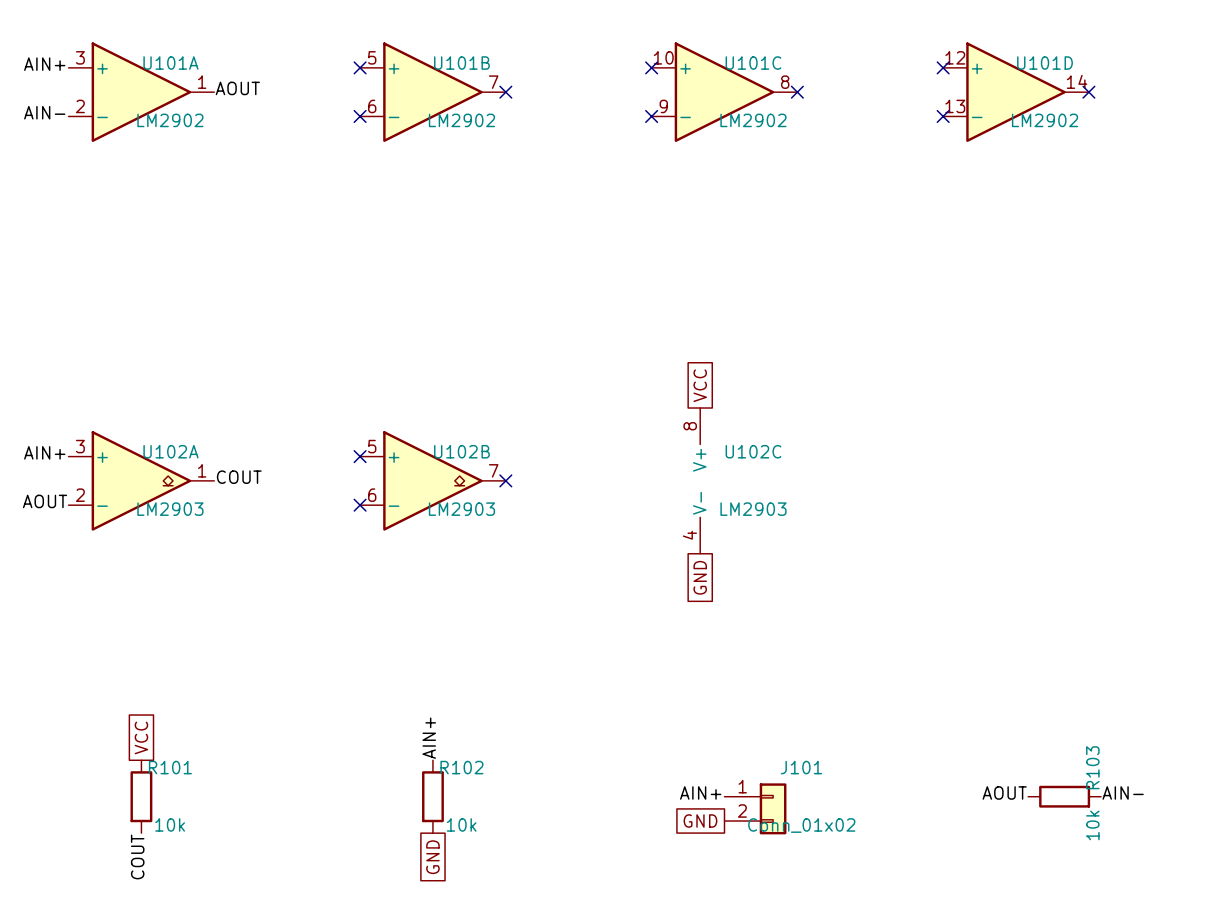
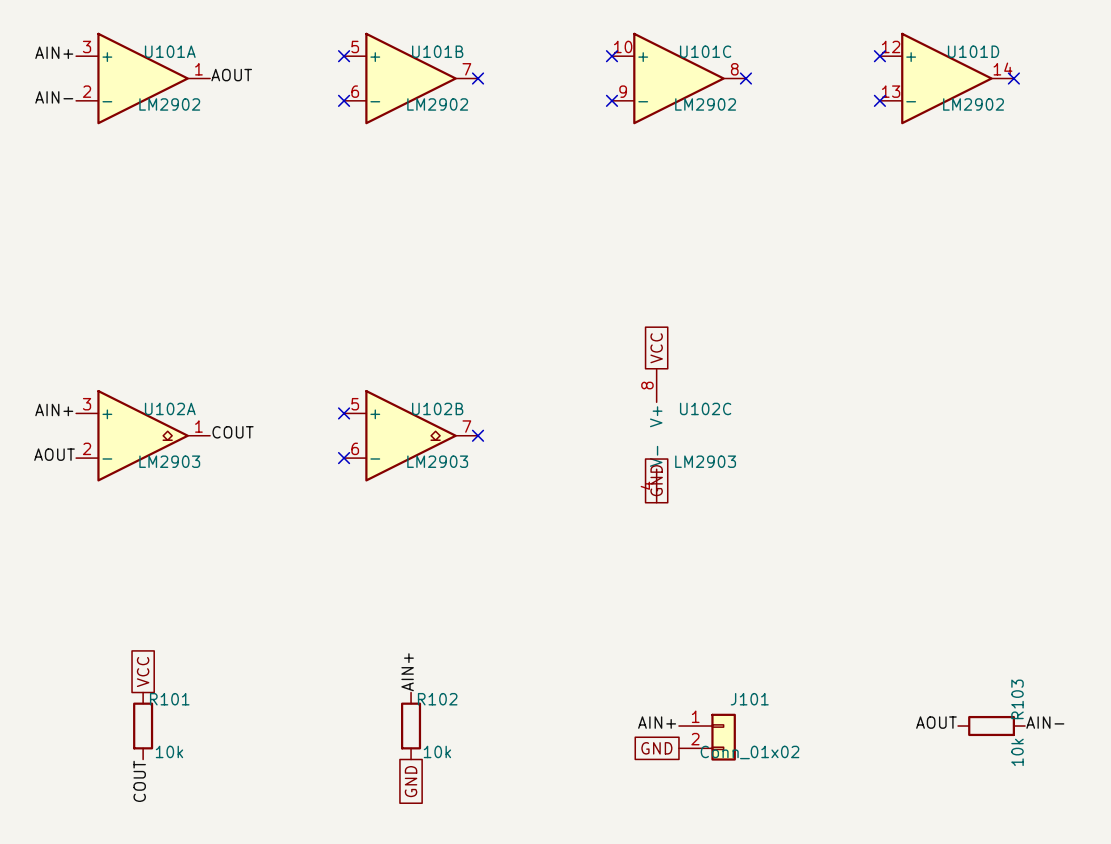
global label rotation: 0° (700, 577) -> 180° (656, 480)

